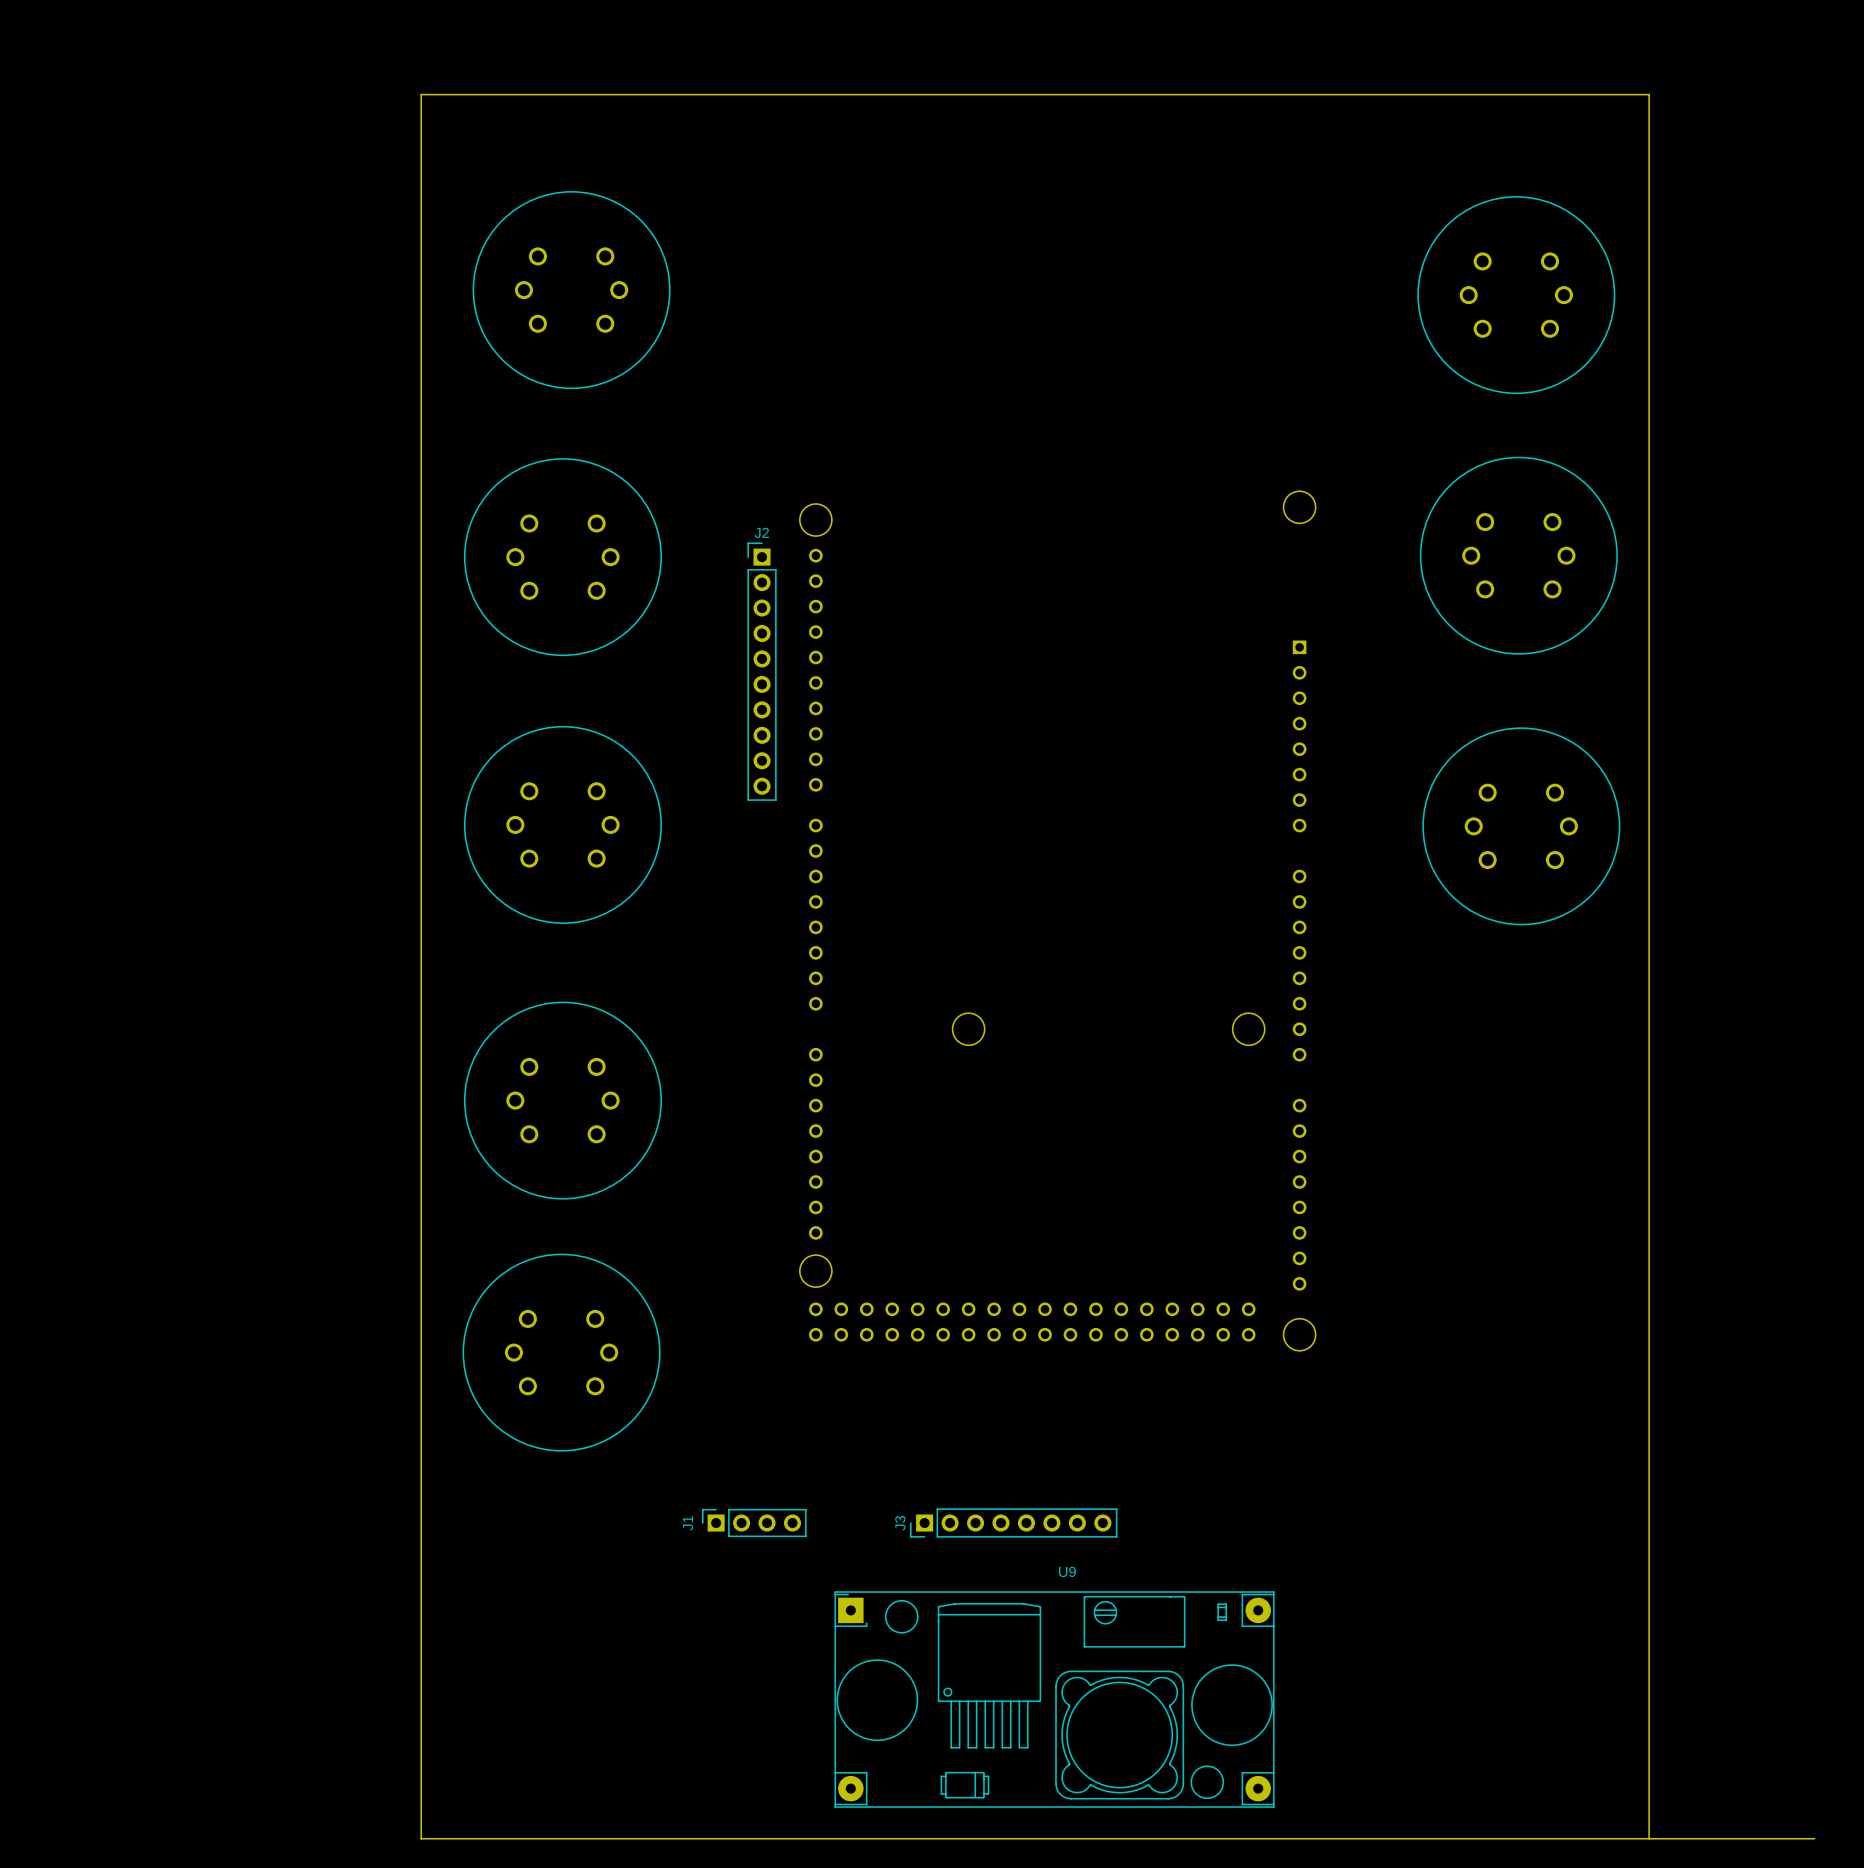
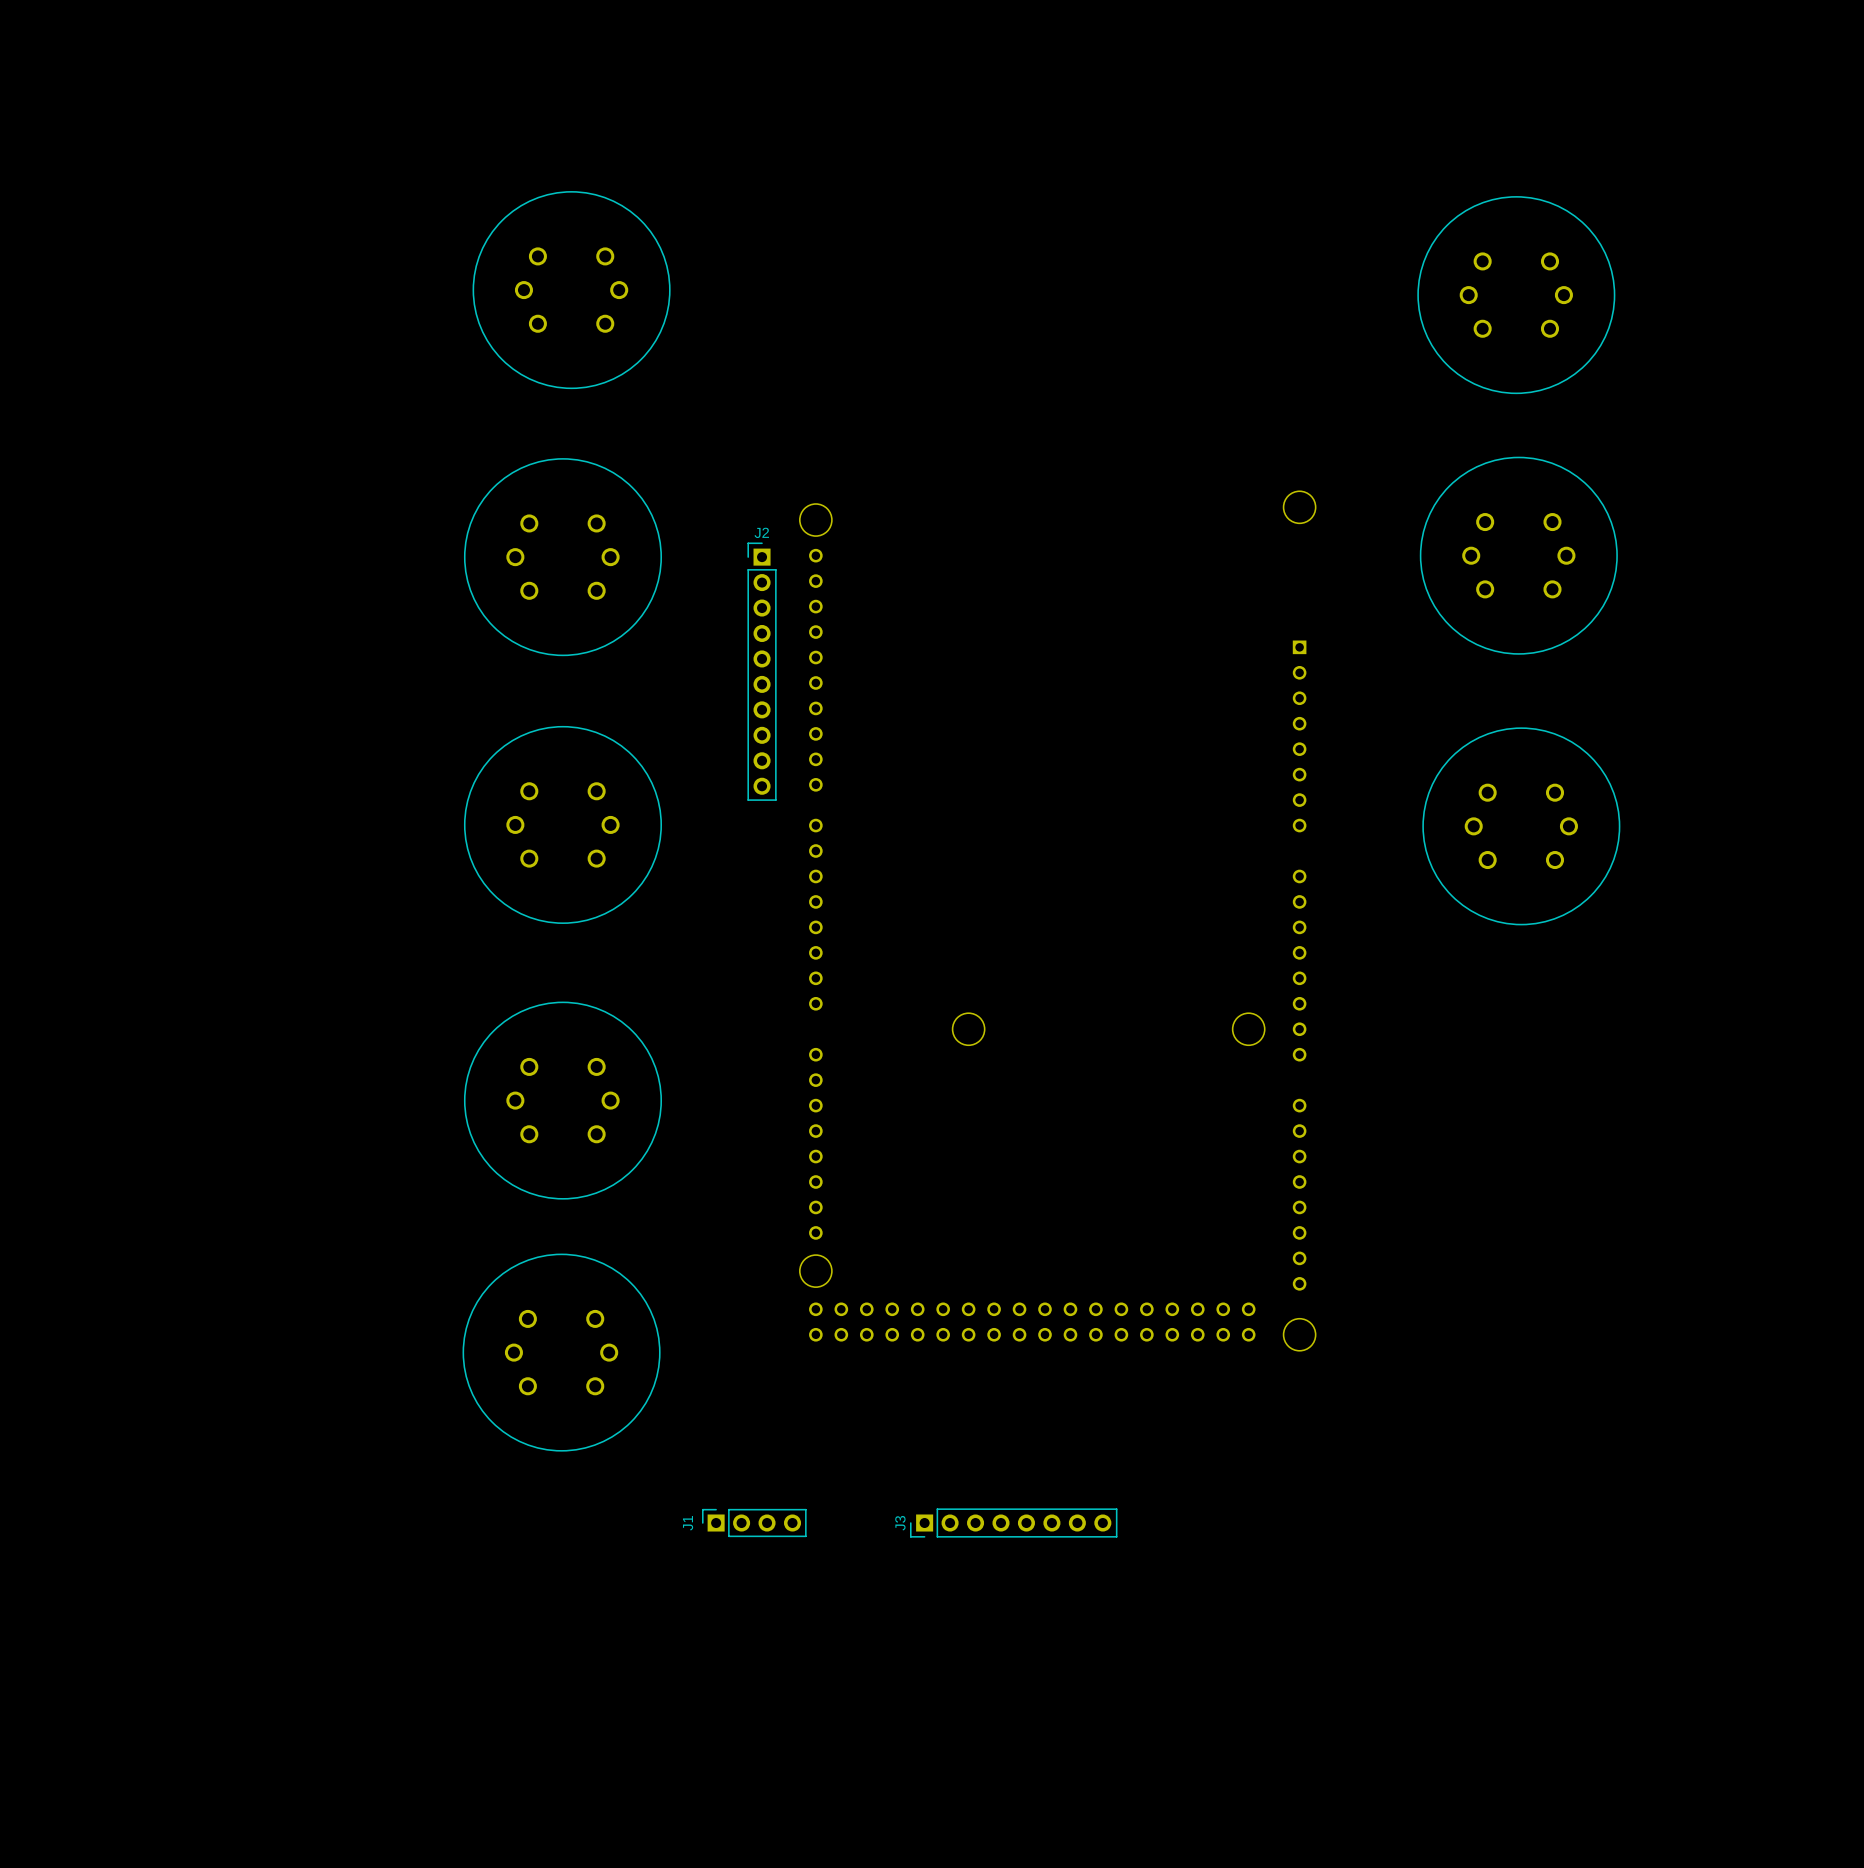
U9: (1054, 1699) -> none
board edge: (1649, 1838) (1649, 94) (421, 94) (421, 1838) (1814, 1838) -> none

